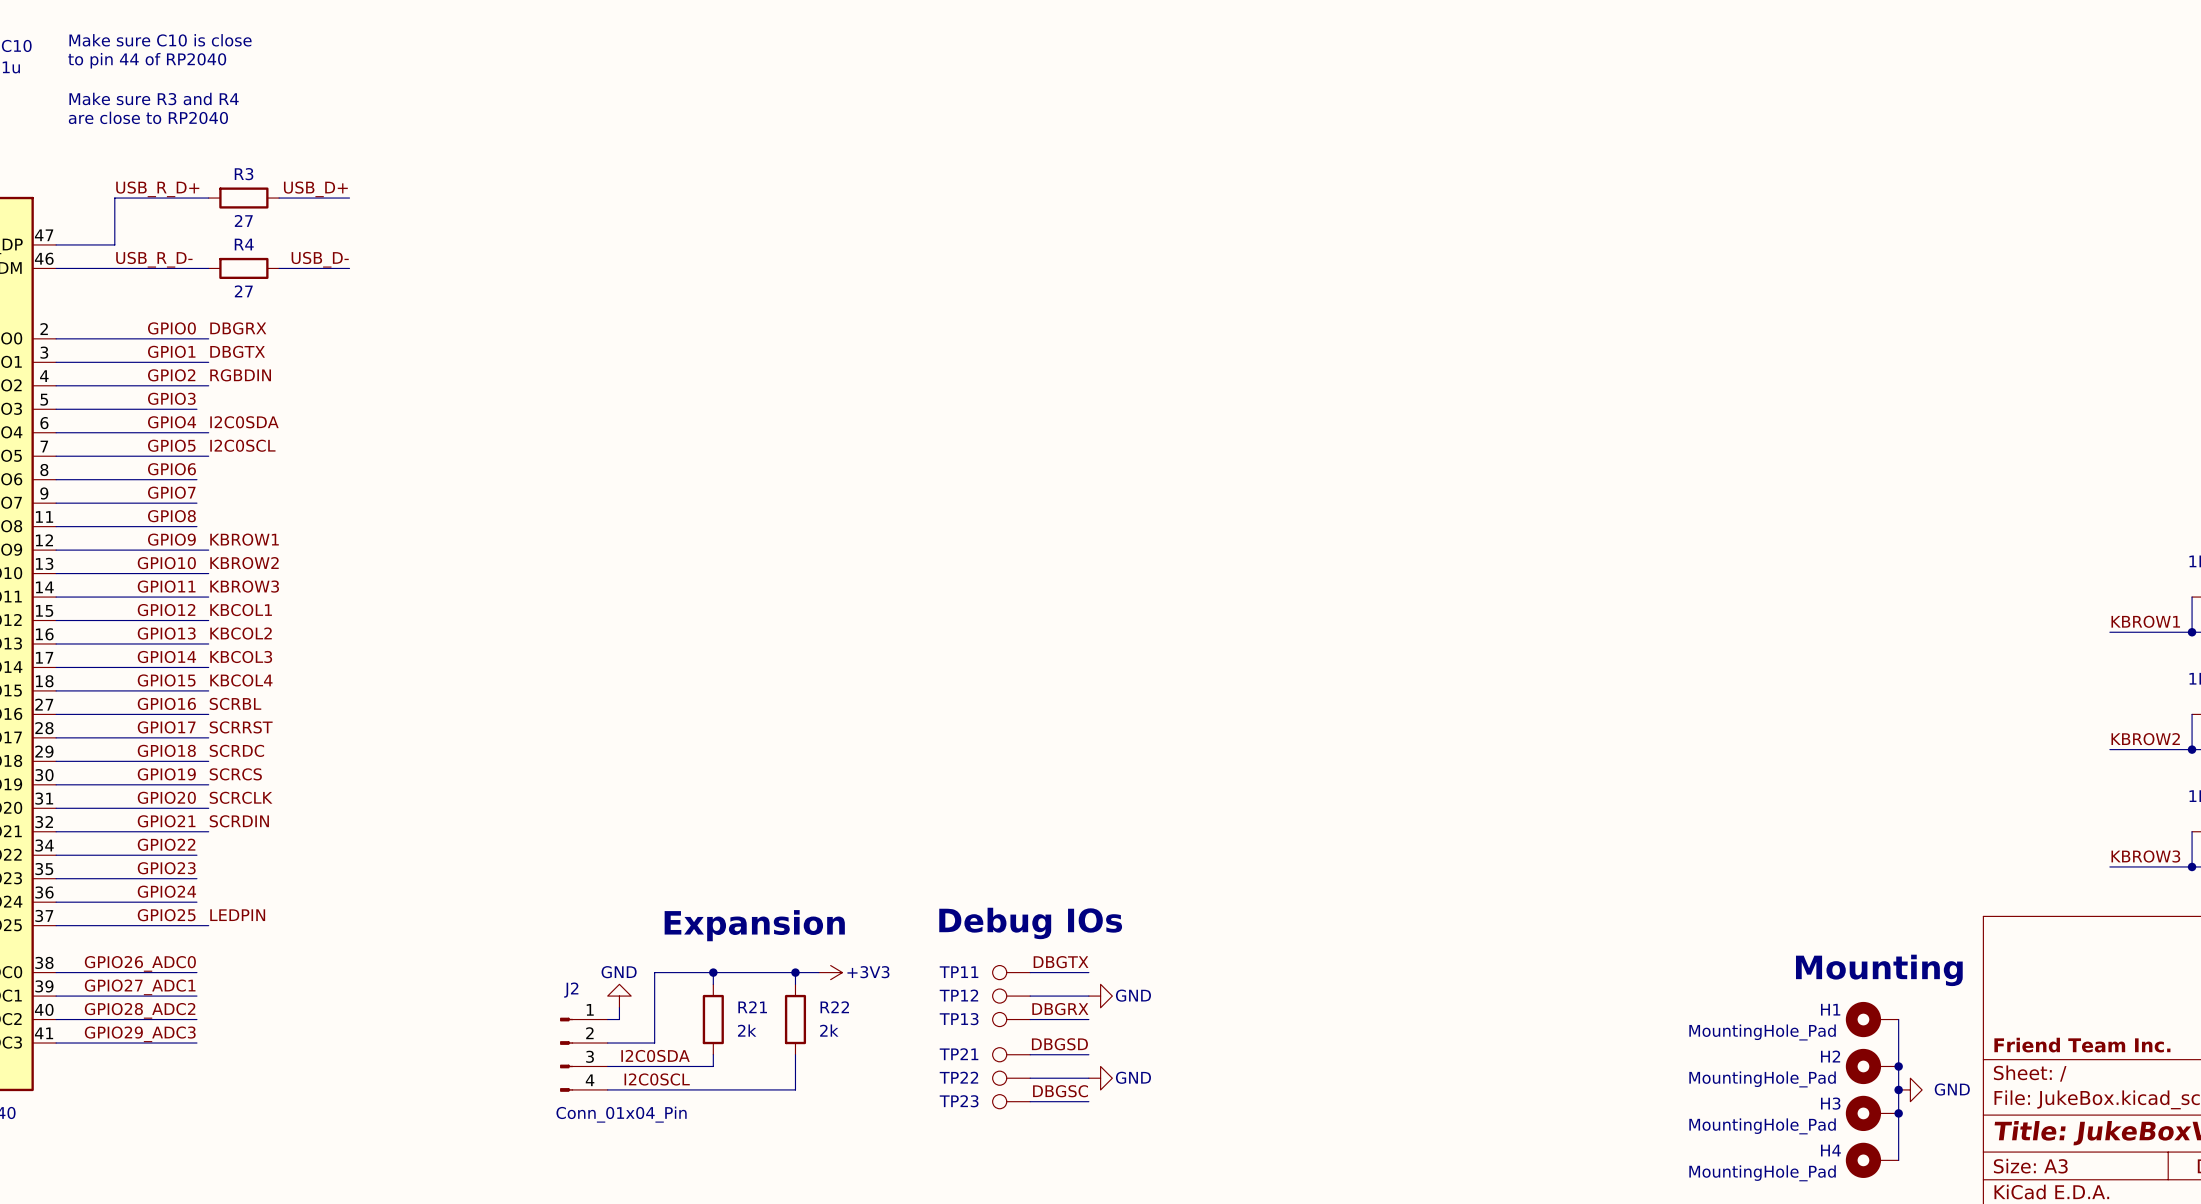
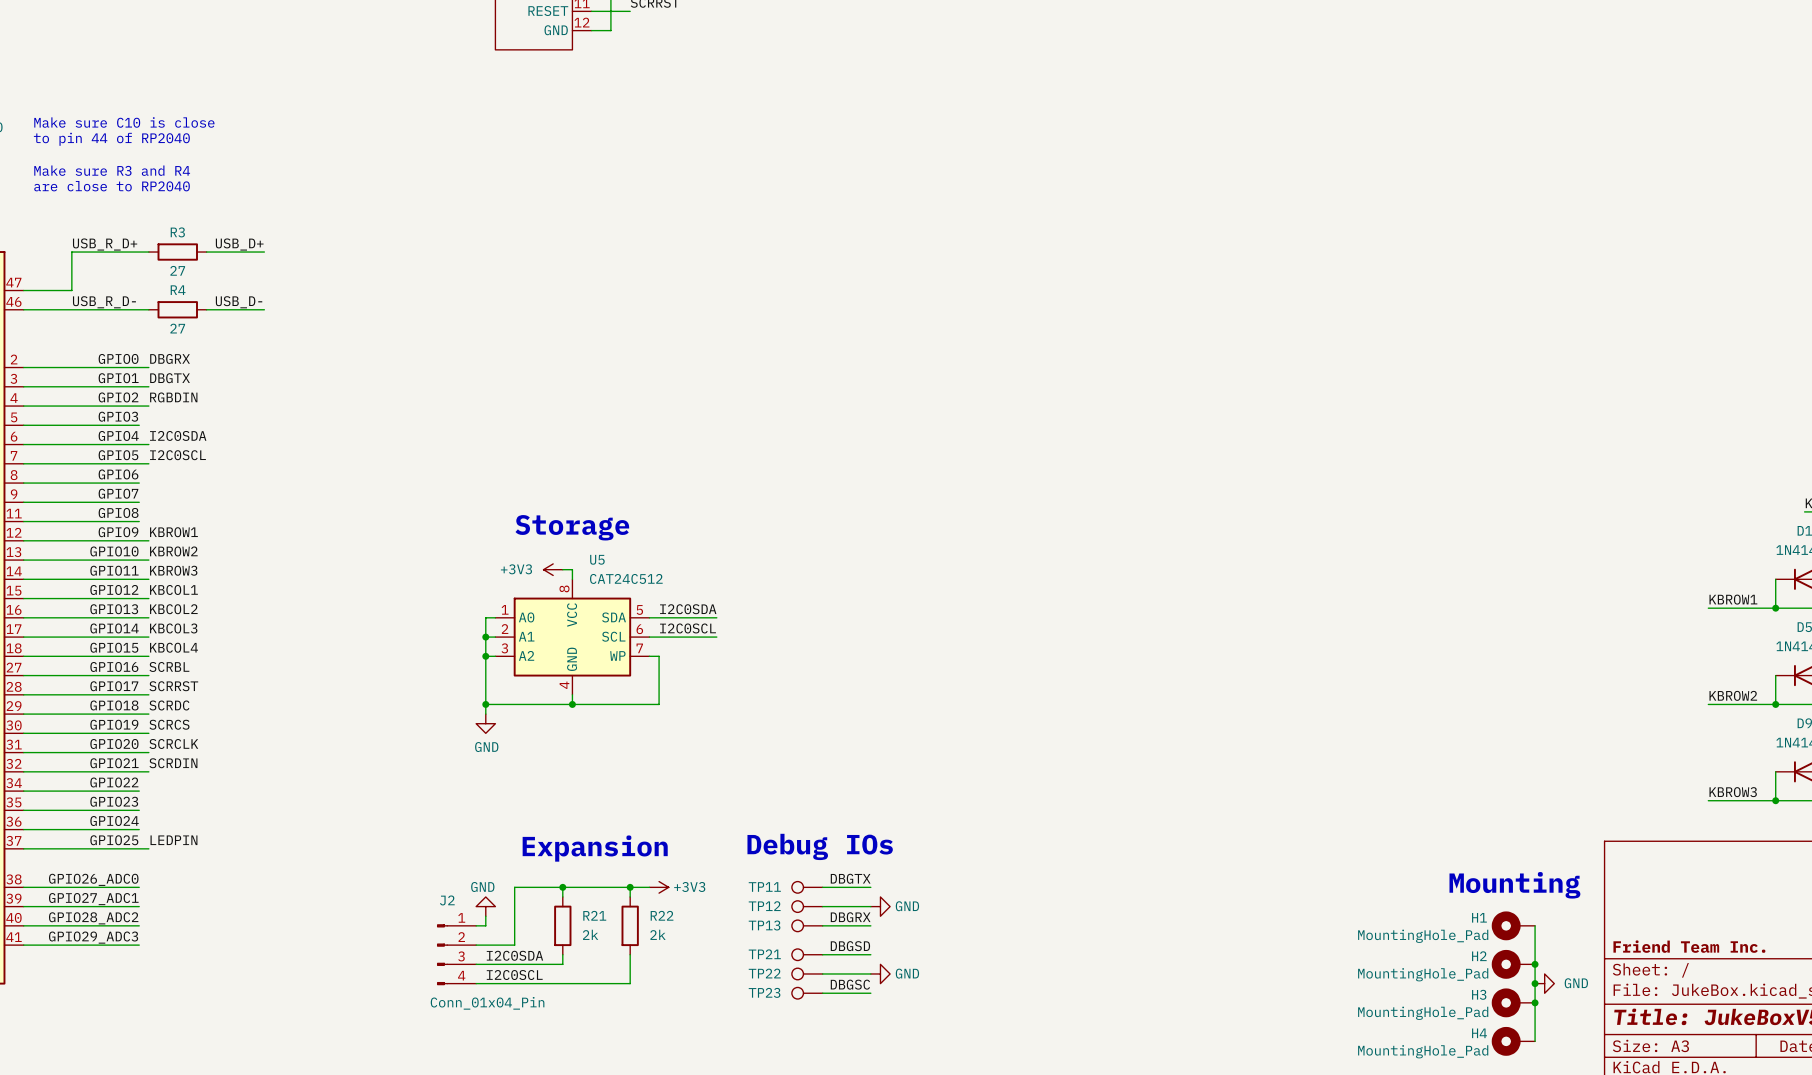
text: none -> Storage (572, 527)
power symbol: none -> +3V3 (553, 569)
wire: none -> (562, 569) (572, 569) (572, 579)
label: none -> I2C0SDA (688, 609)
wire: none -> (495, 617) (485, 617) (485, 714)
wire: none -> (649, 617) (716, 617)
label: none -> I2C0SCL (687, 628)
wire: none -> (485, 637) (495, 637)
junction: none -> (485, 637)
U5: none -> CAT24C512 (572, 637)
wire: none -> (649, 637) (716, 637)
wire: none -> (485, 656) (495, 656)
junction: none -> (485, 656)
wire: none -> (649, 656) (659, 656) (659, 704) (485, 704)
wire: none -> (572, 694) (572, 704)
junction: none -> (485, 704)
junction: none -> (572, 704)
power symbol: none -> GND (485, 723)

